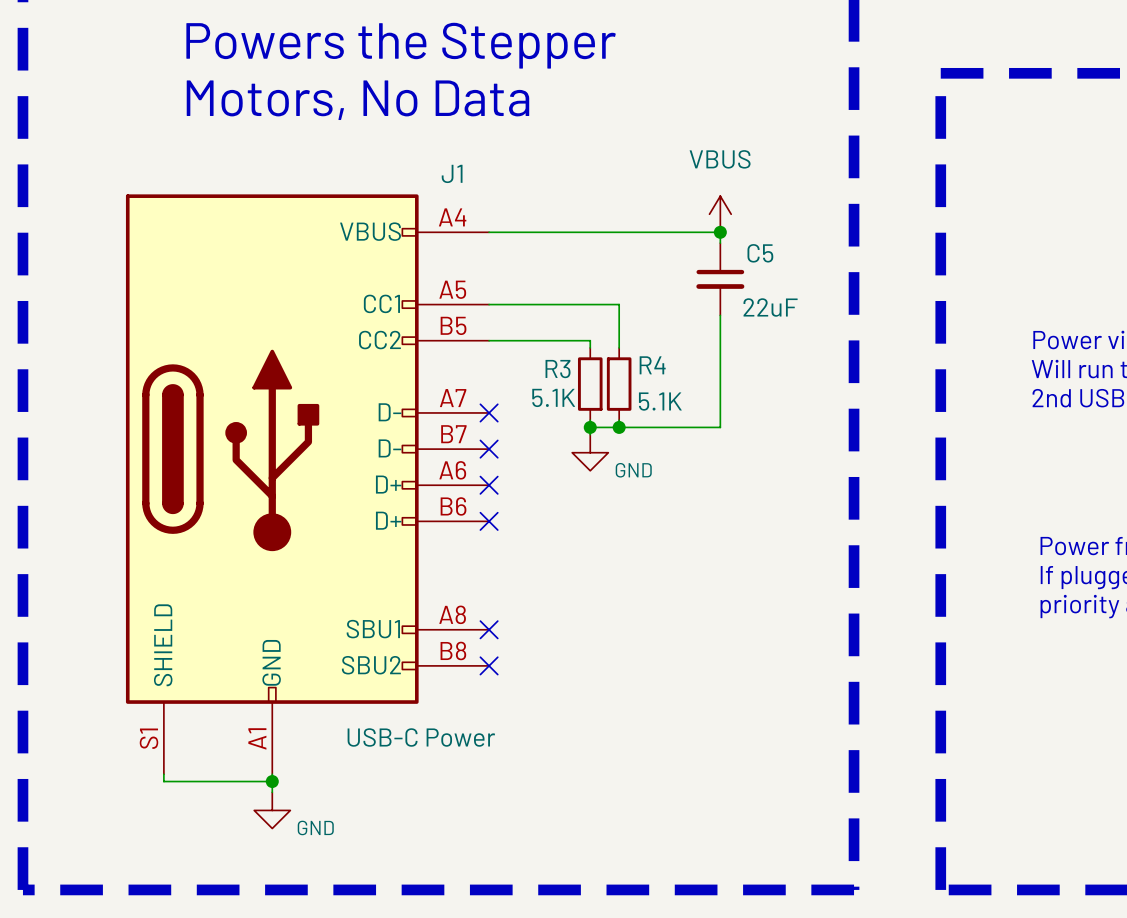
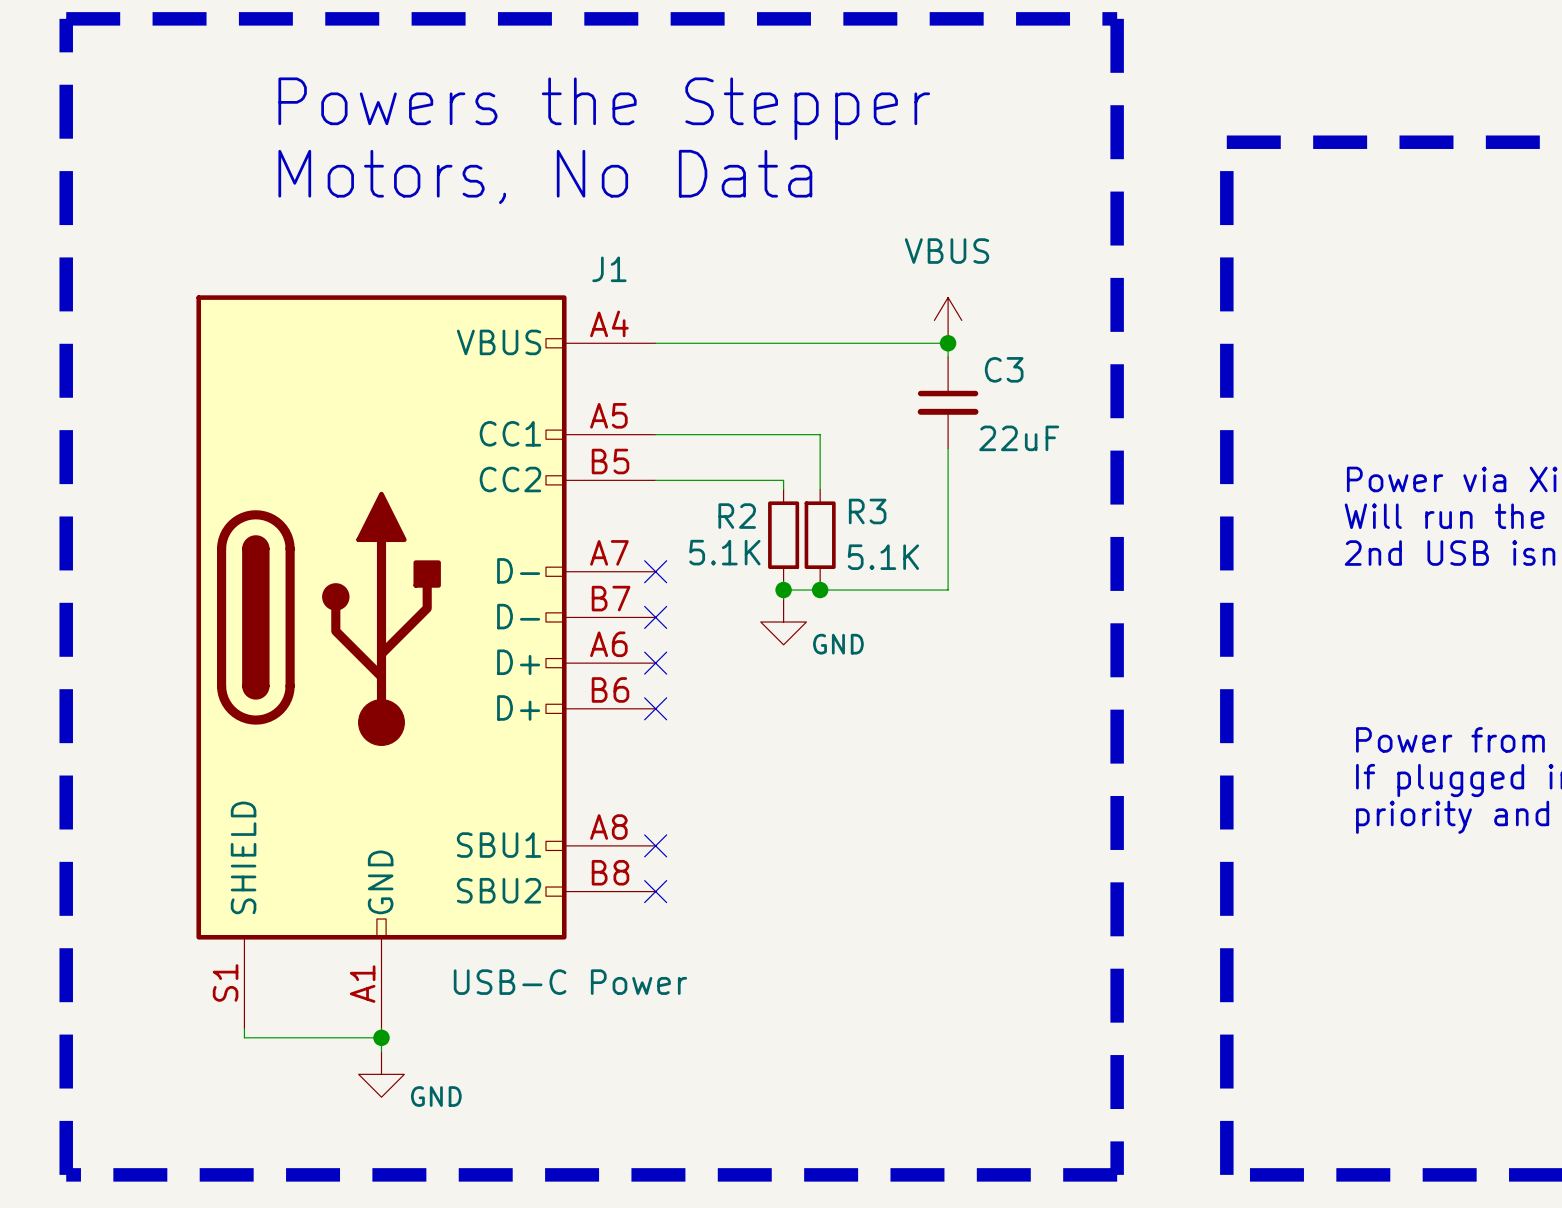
C5 name: C5 (760, 253) -> C3 (1004, 369)
R4 name: R4 (652, 365) -> R3 (867, 511)
R3 name: R3 (558, 369) -> R2 (737, 516)

